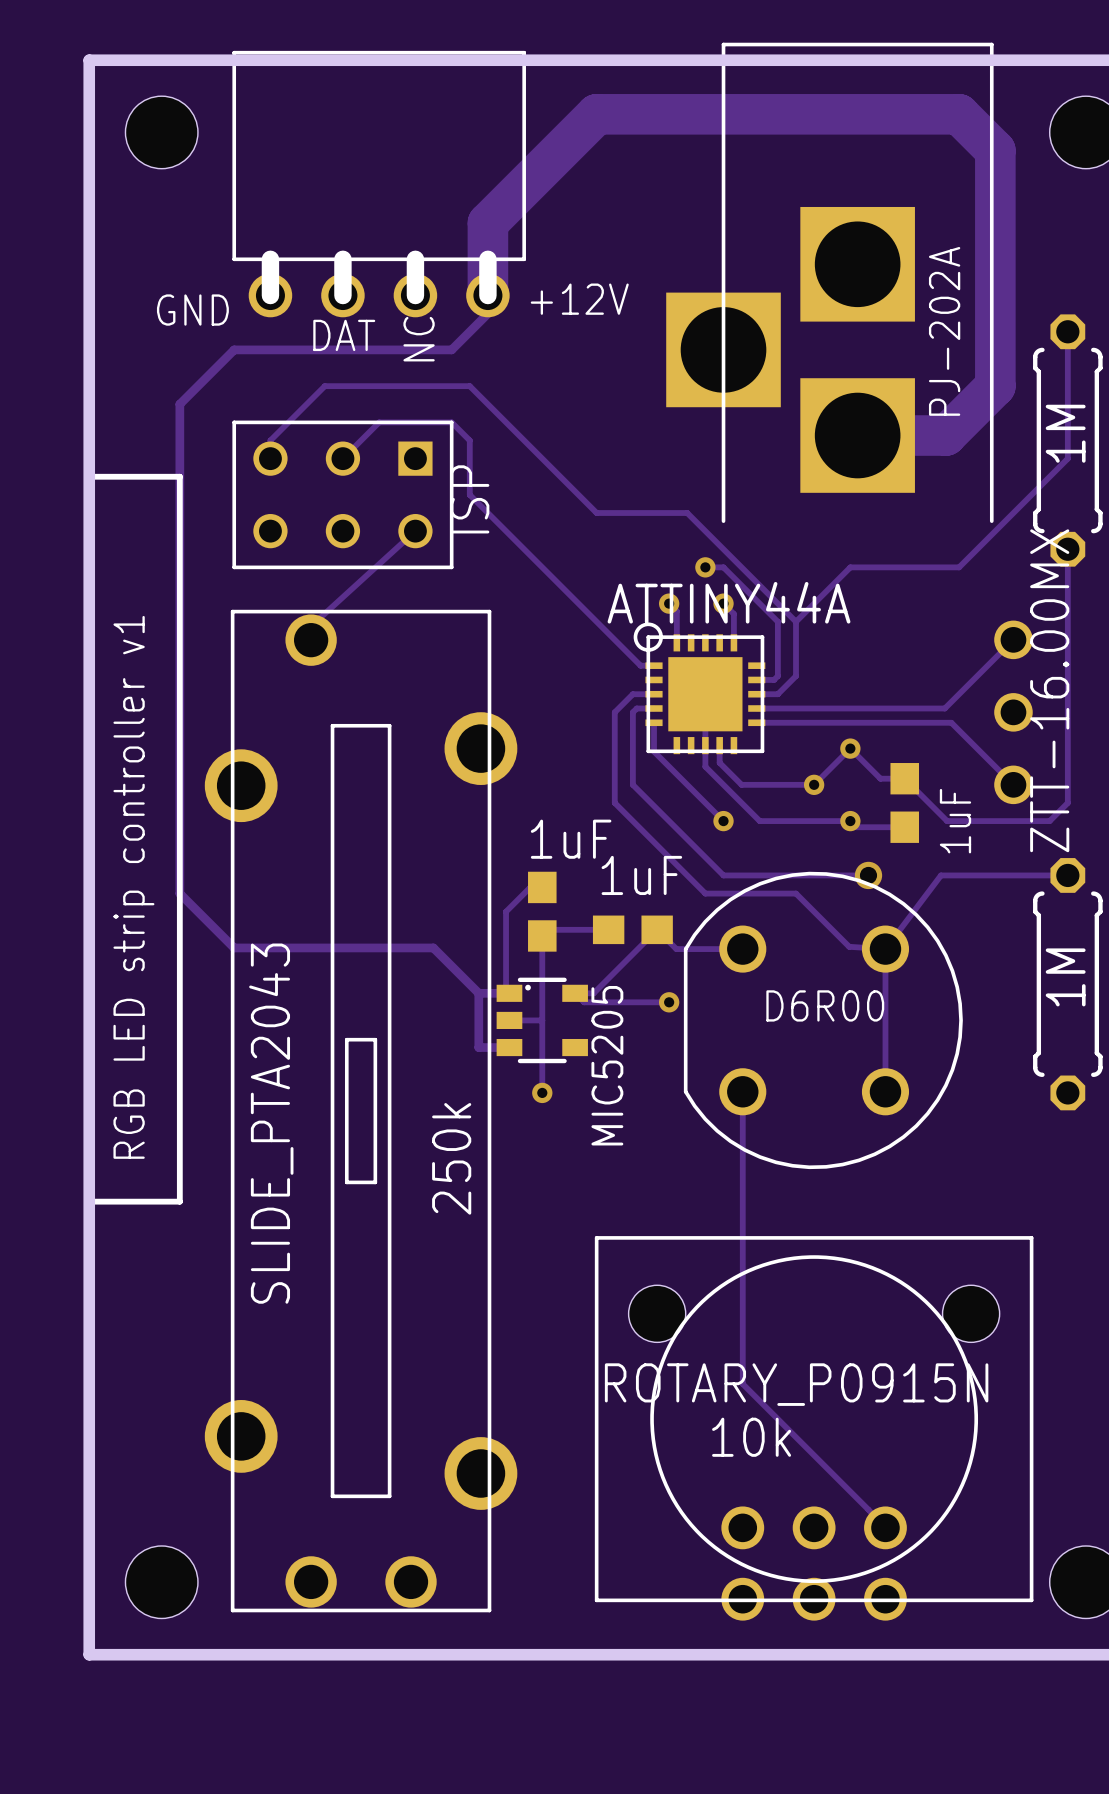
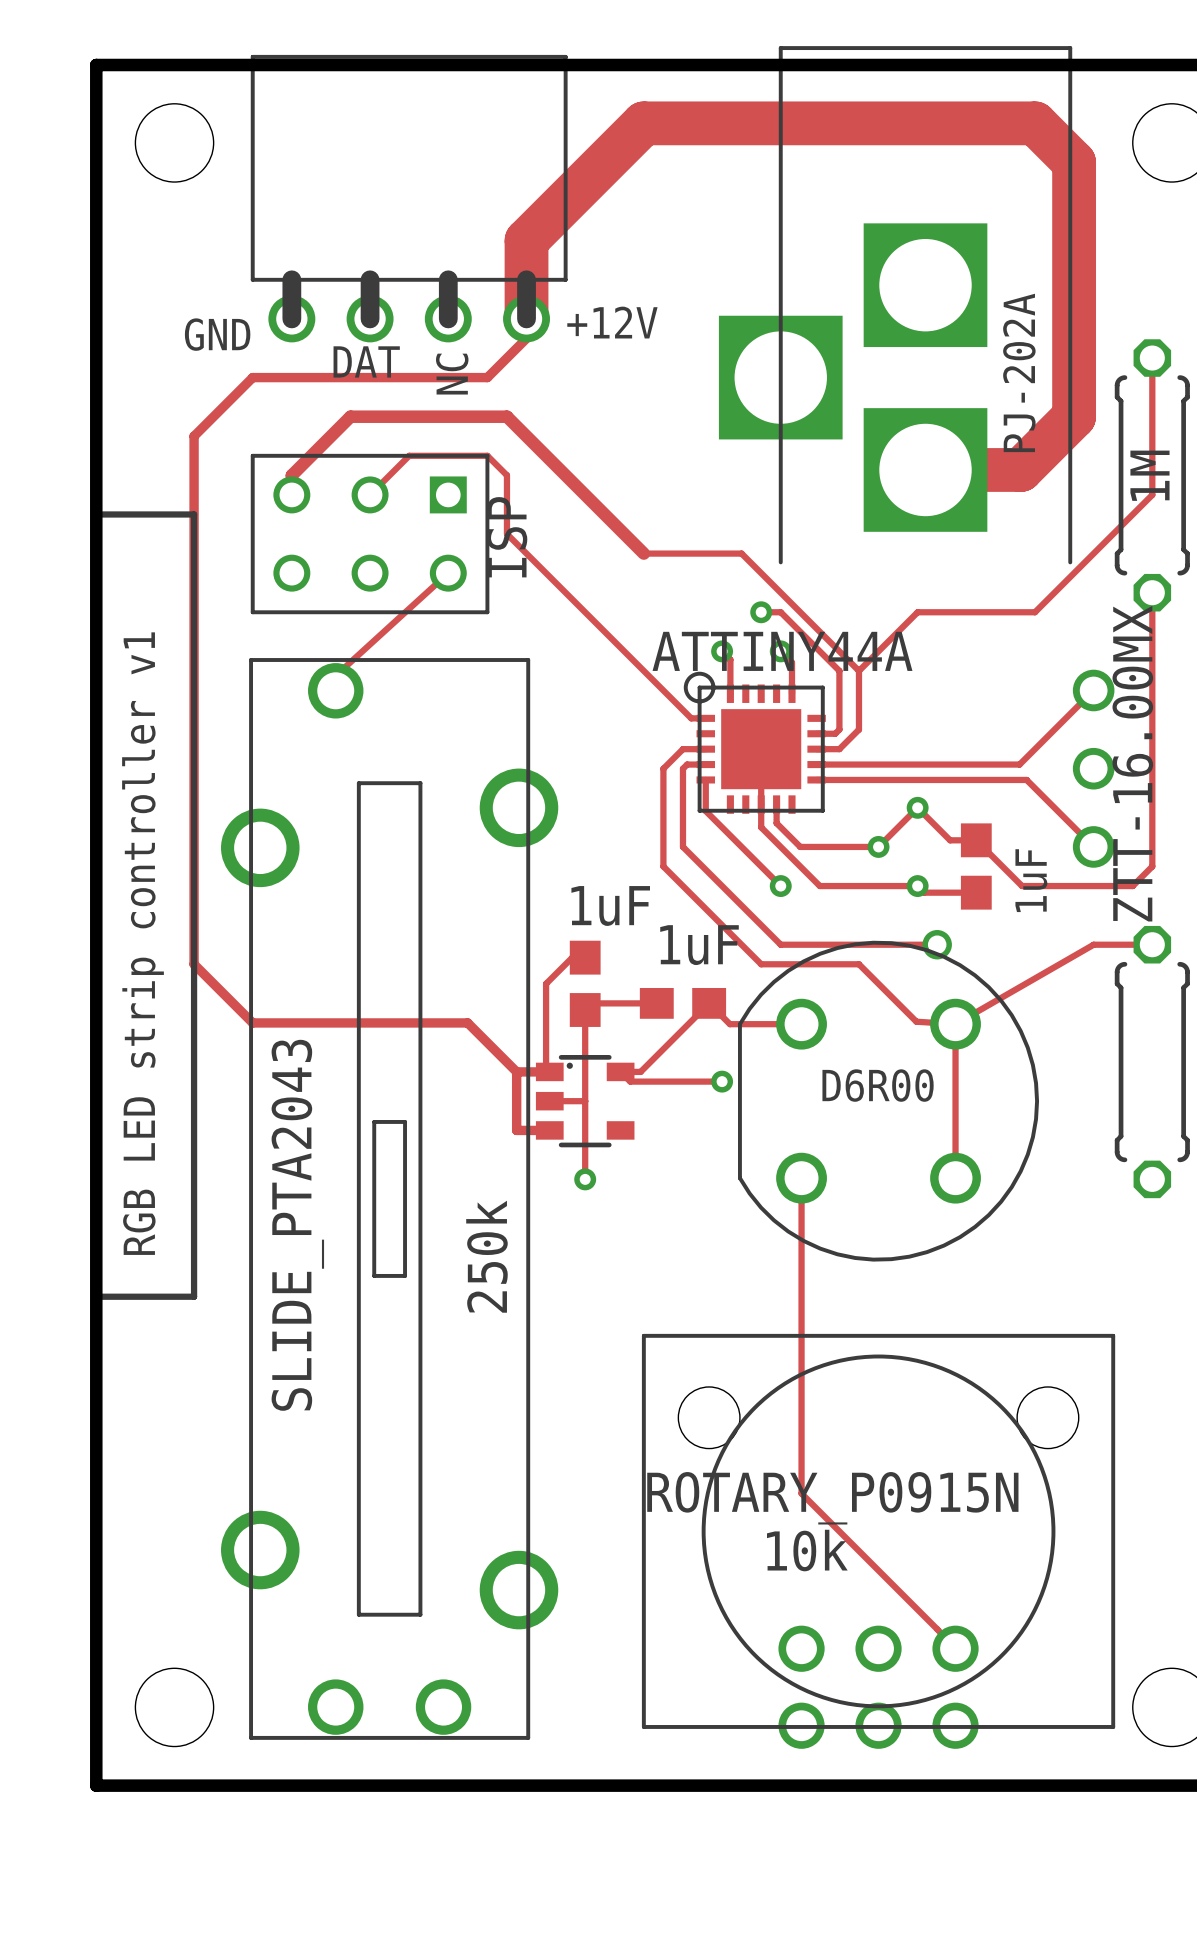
track width: thin (270, 458) (270, 440) (324, 386) (469, 386) (596, 513) -> thick (291, 494) (291, 475) (350, 416) (506, 416) (643, 553)
track: (1013, 875) (940, 875) (885, 949) -> (1093, 944) (955, 1024)
part value: 1M (1065, 977) -> none
part value: MIC5205 (607, 1065) -> none

